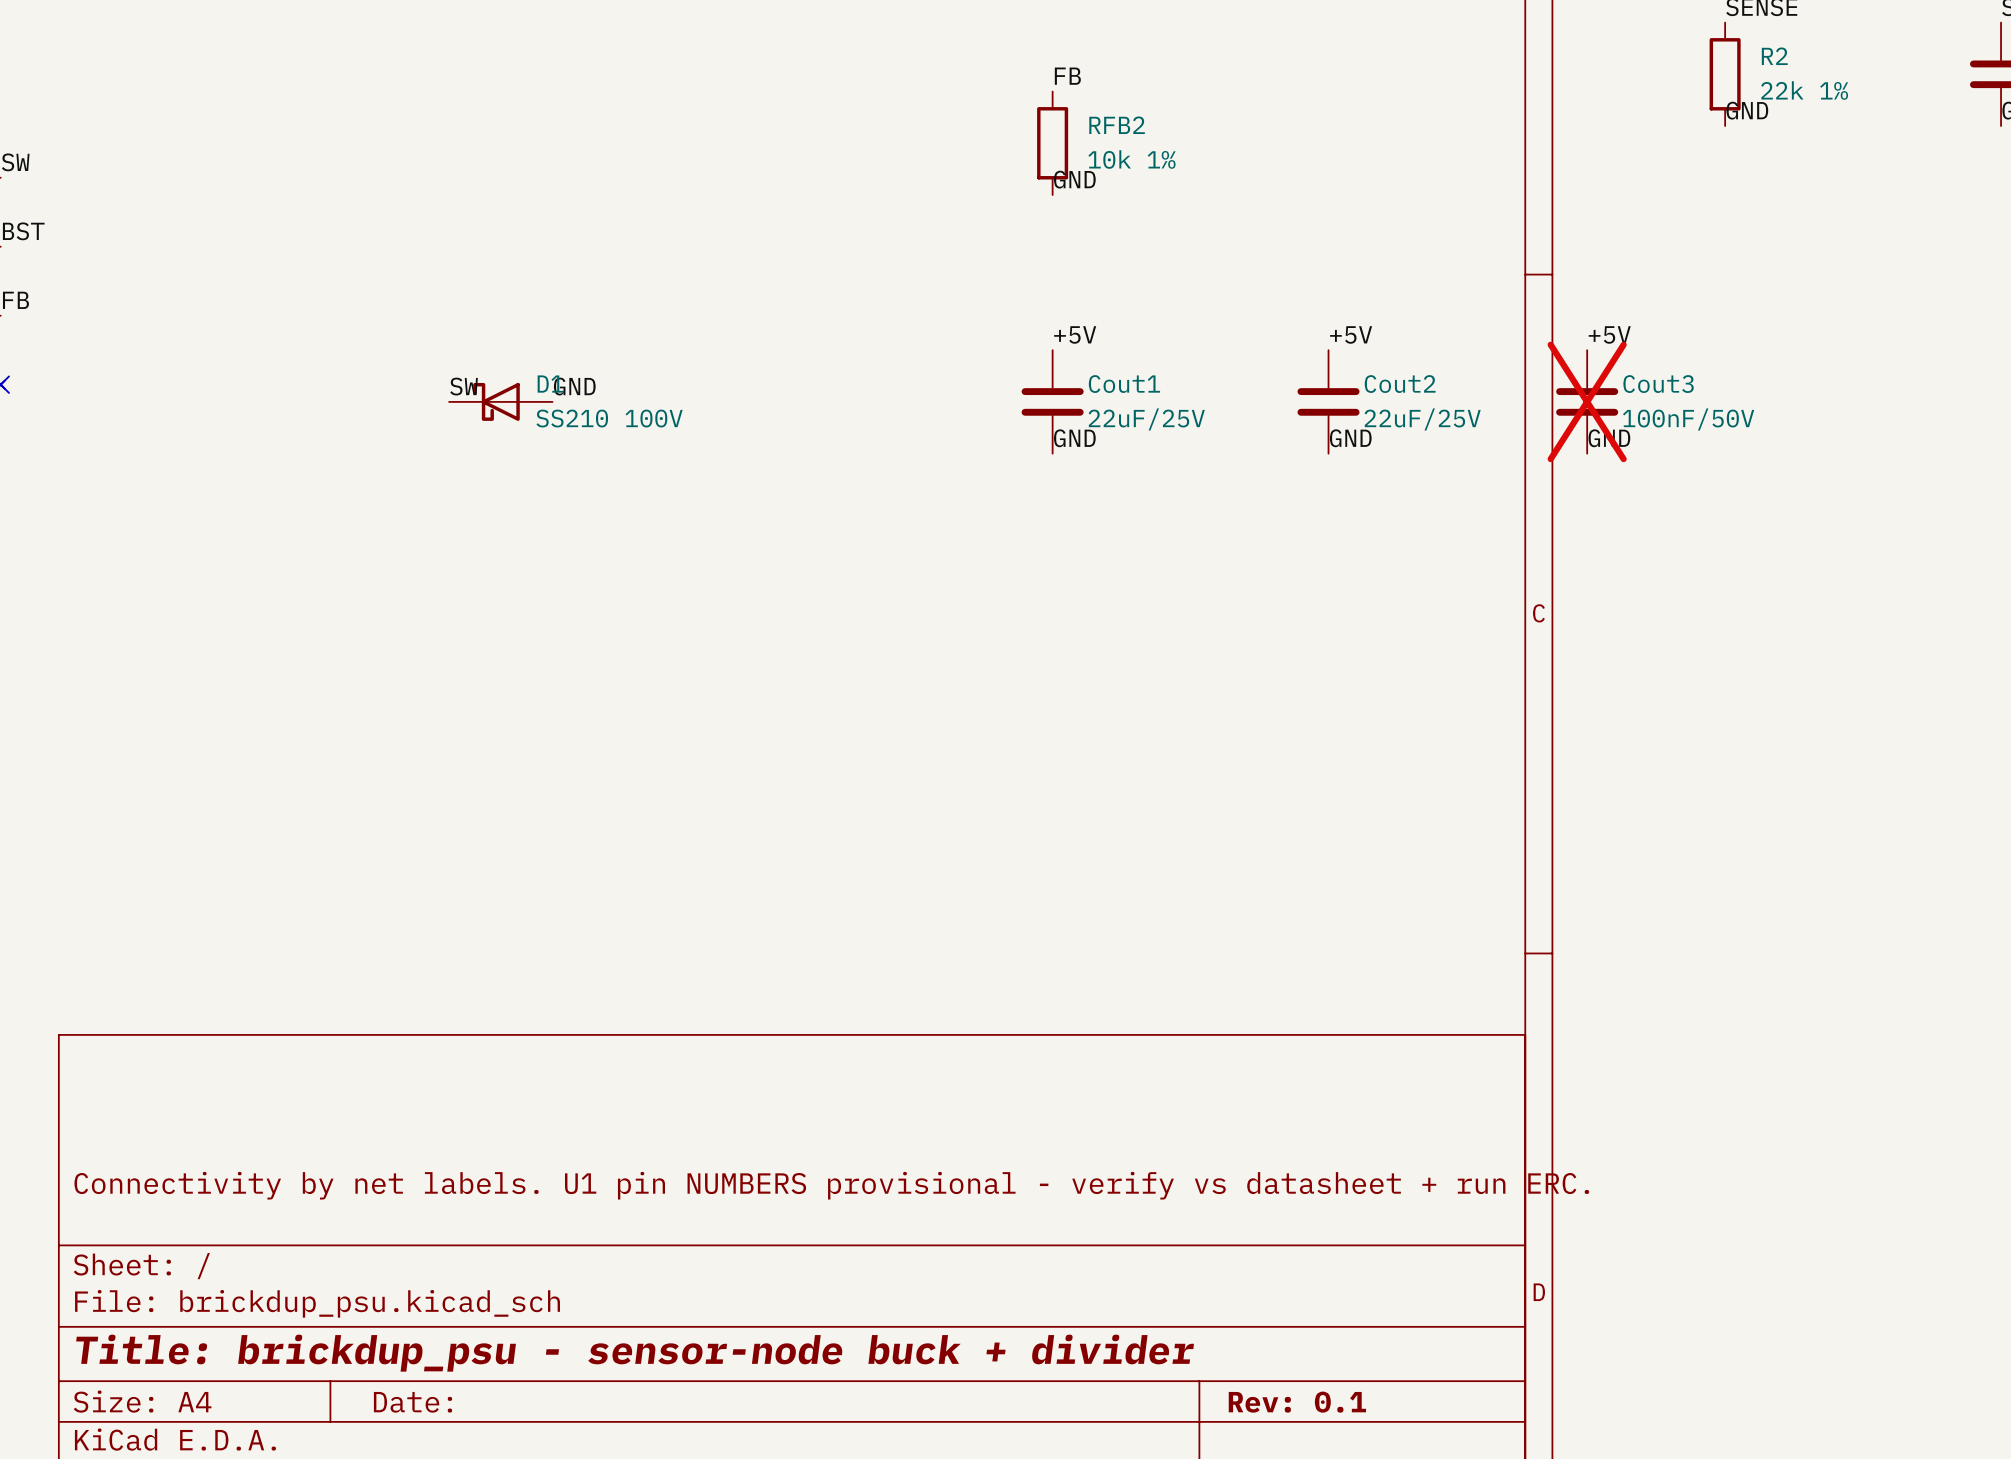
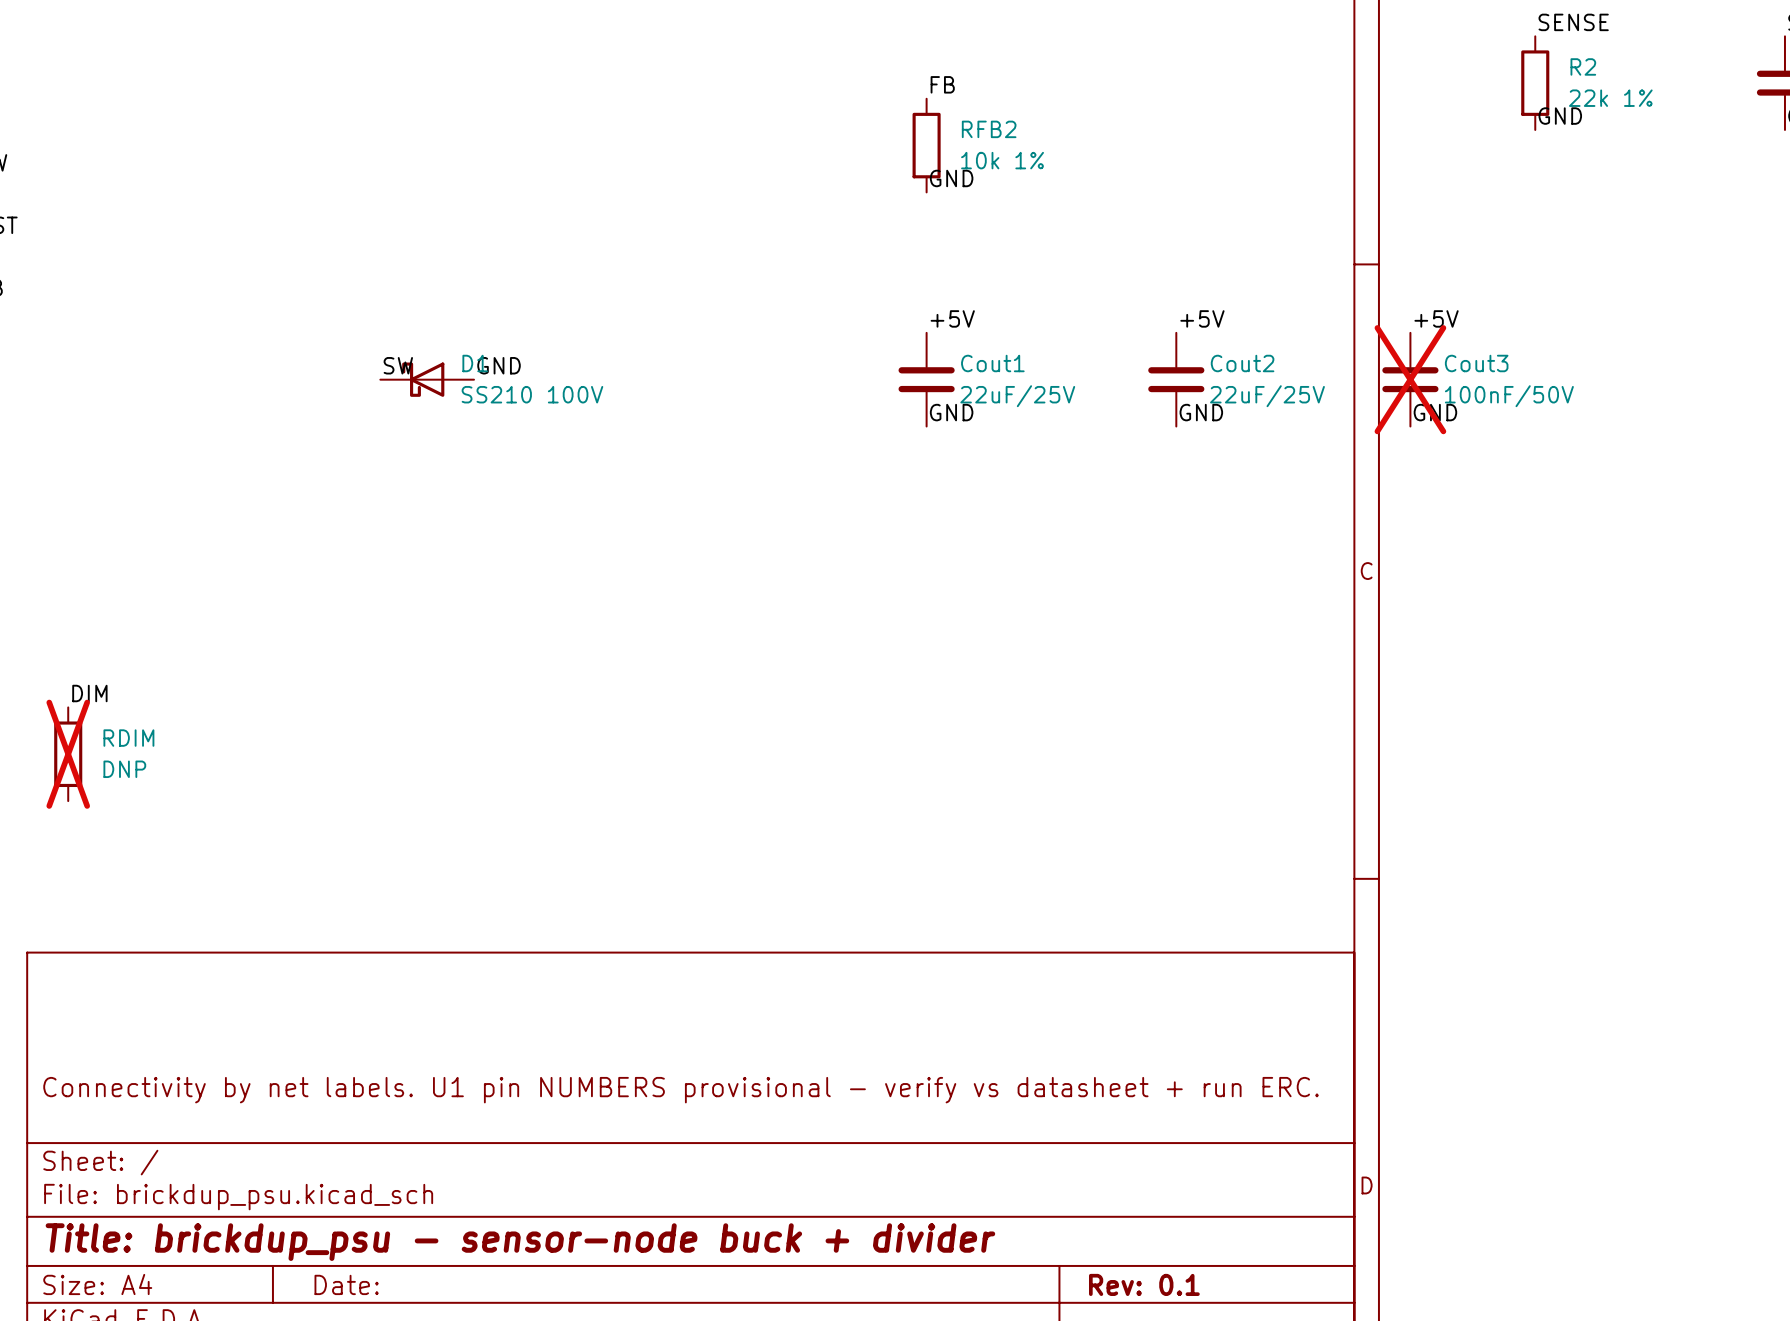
label: none -> DIM (89, 693)
RDIM: none -> DNP (68, 754)

